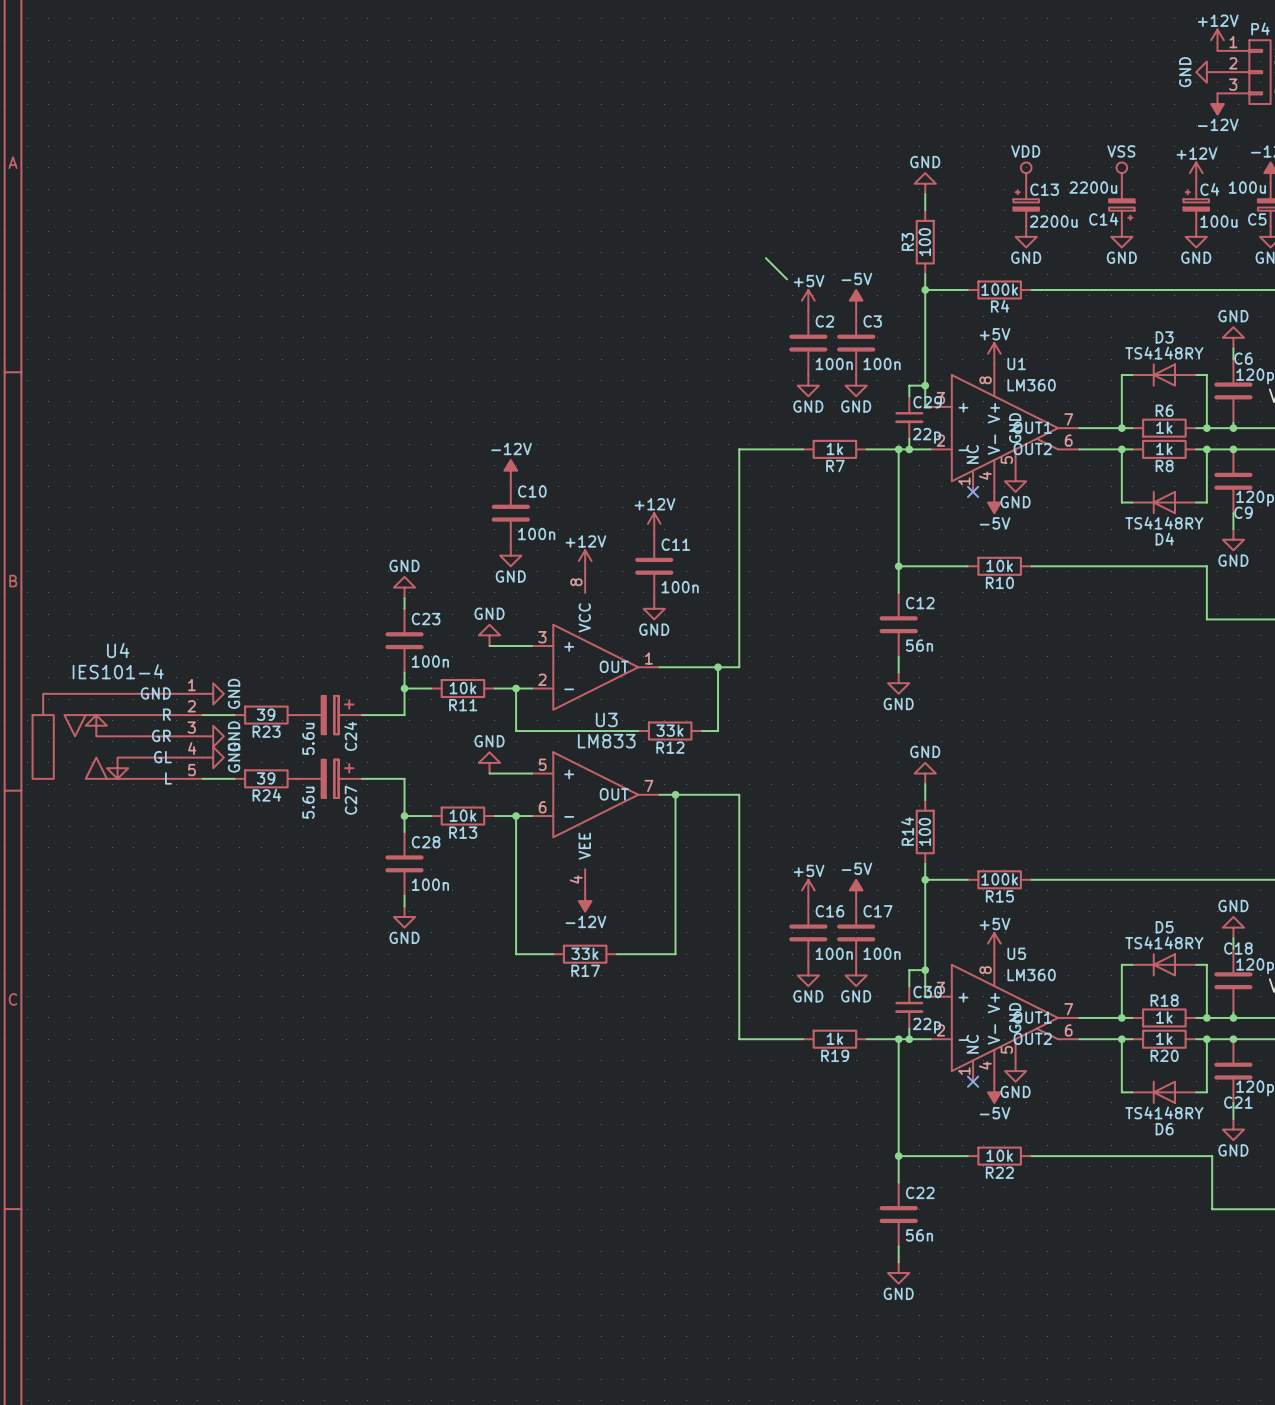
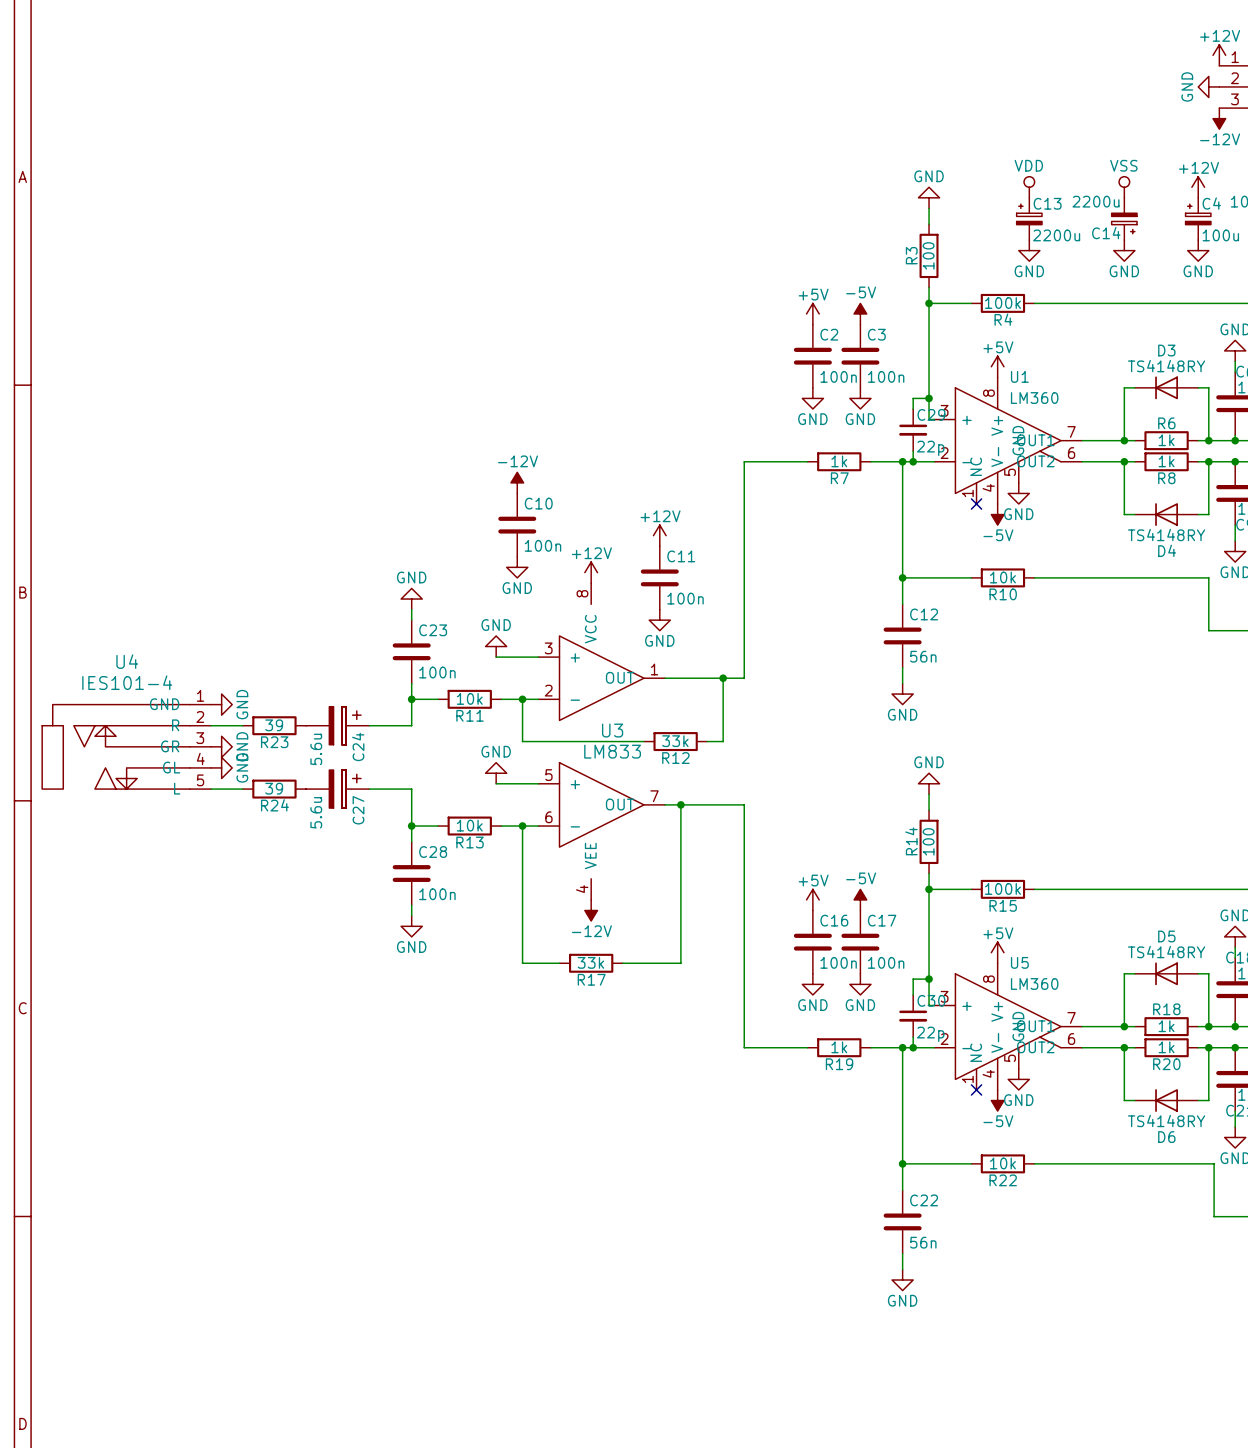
wire: (765, 258) (787, 279) -> none

